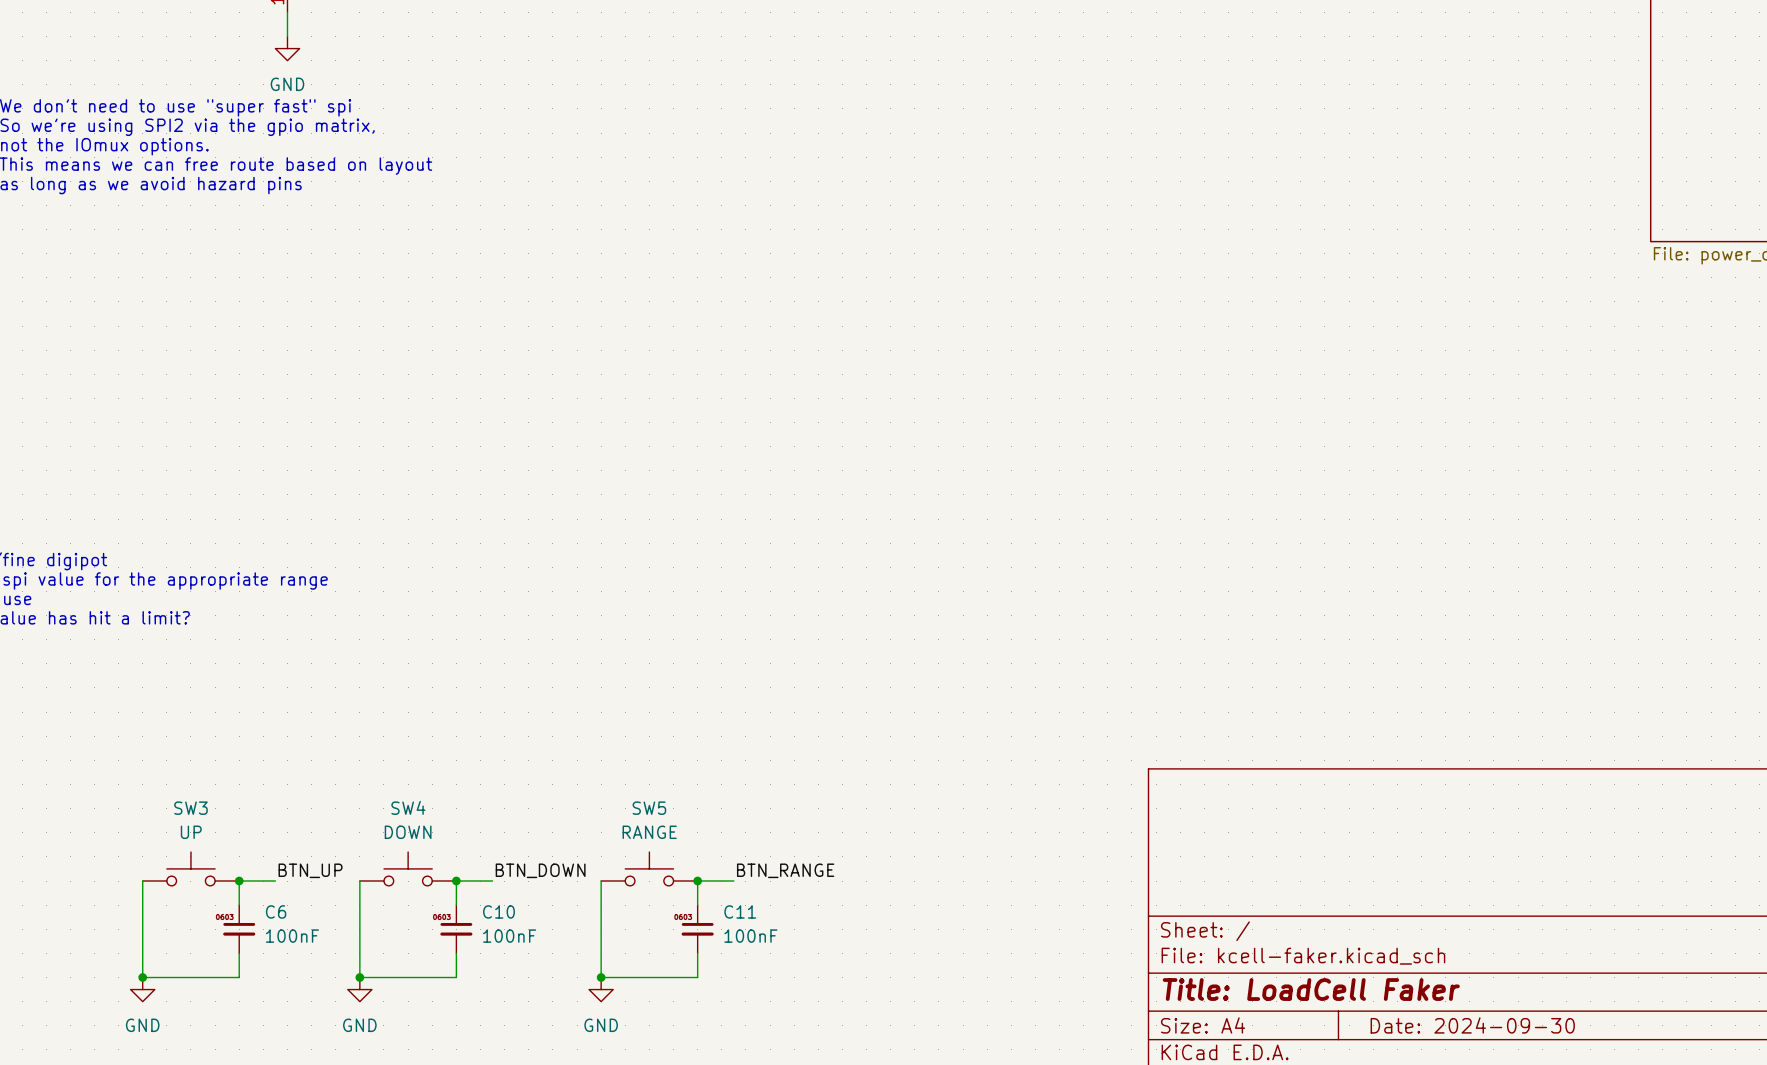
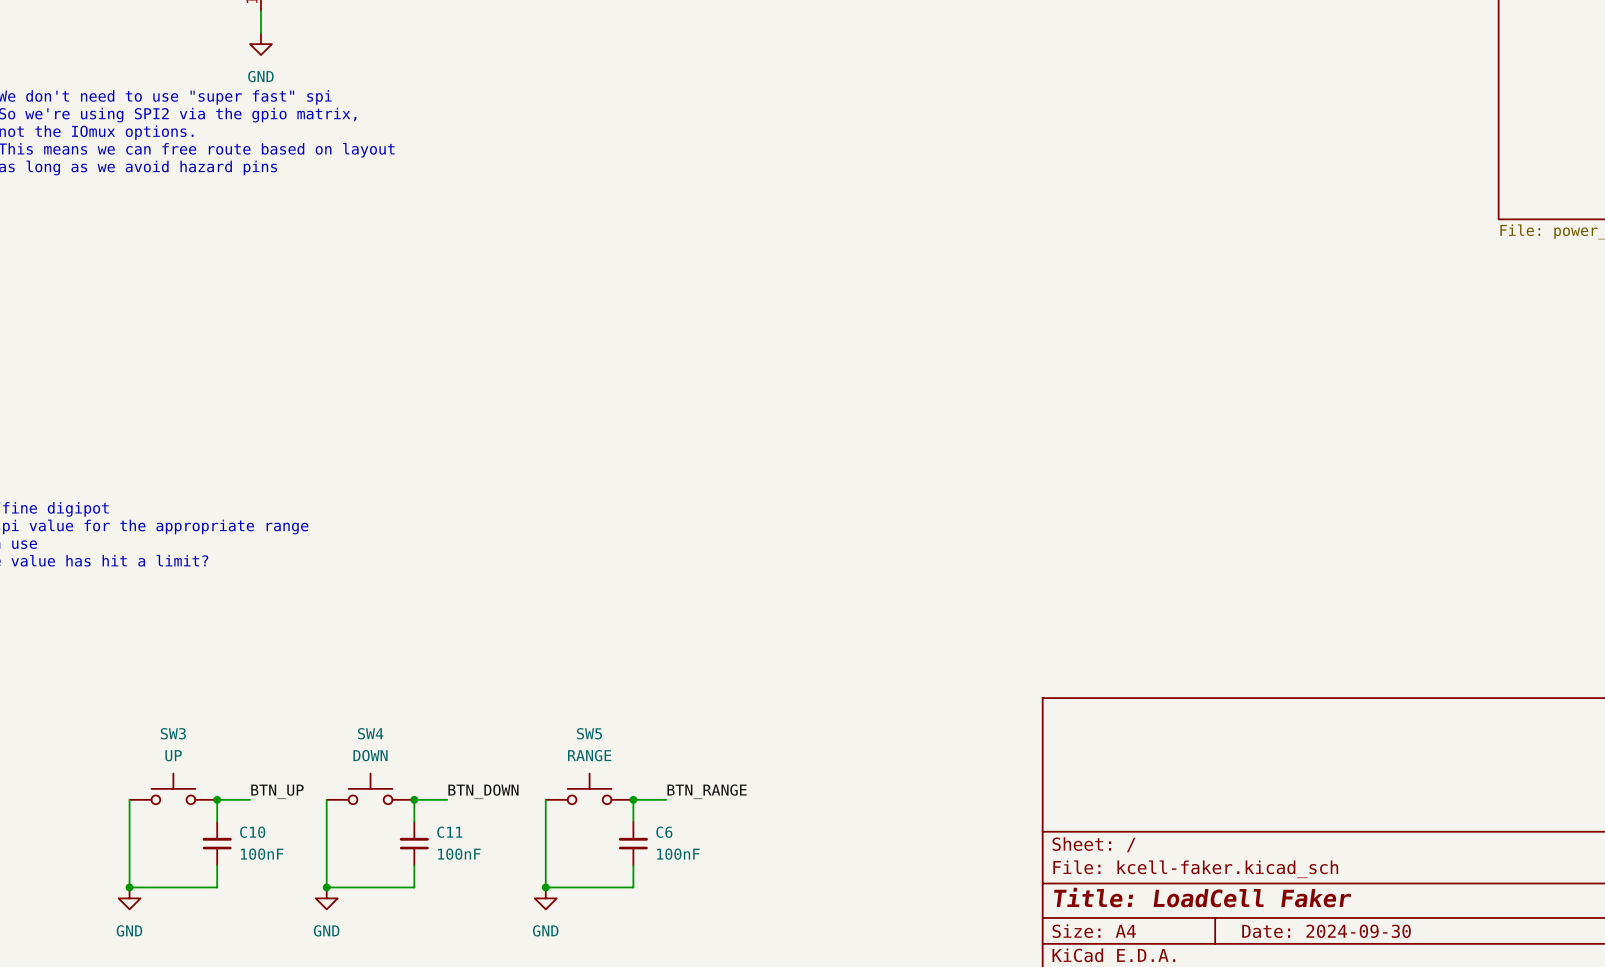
C6 symbol: [223, 905, 256, 954] -> [618, 821, 648, 866]
C10 symbol: [440, 905, 473, 954] -> [202, 821, 232, 866]
C11 symbol: [681, 905, 714, 954] -> [399, 821, 429, 866]

